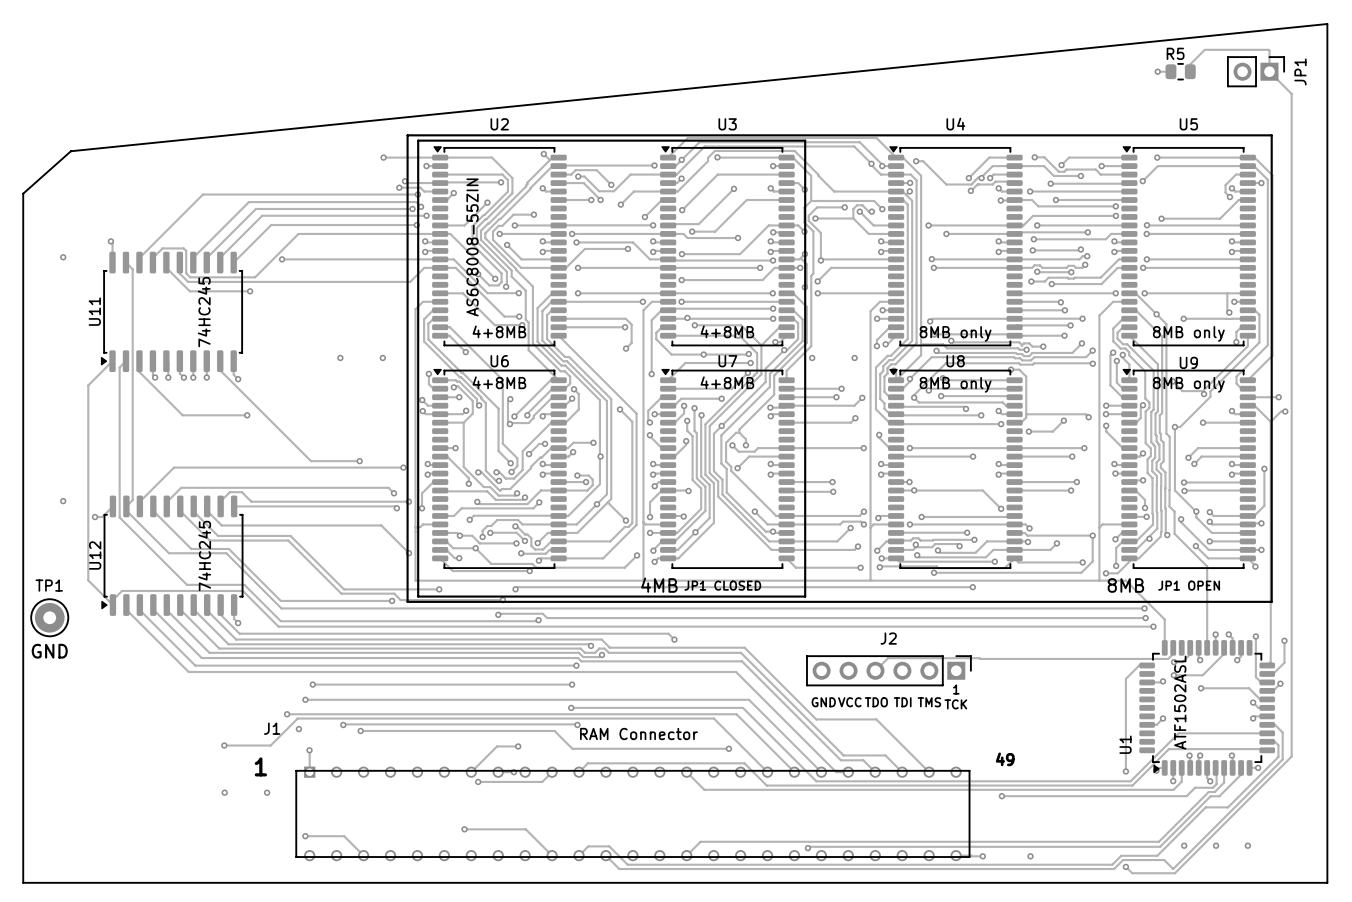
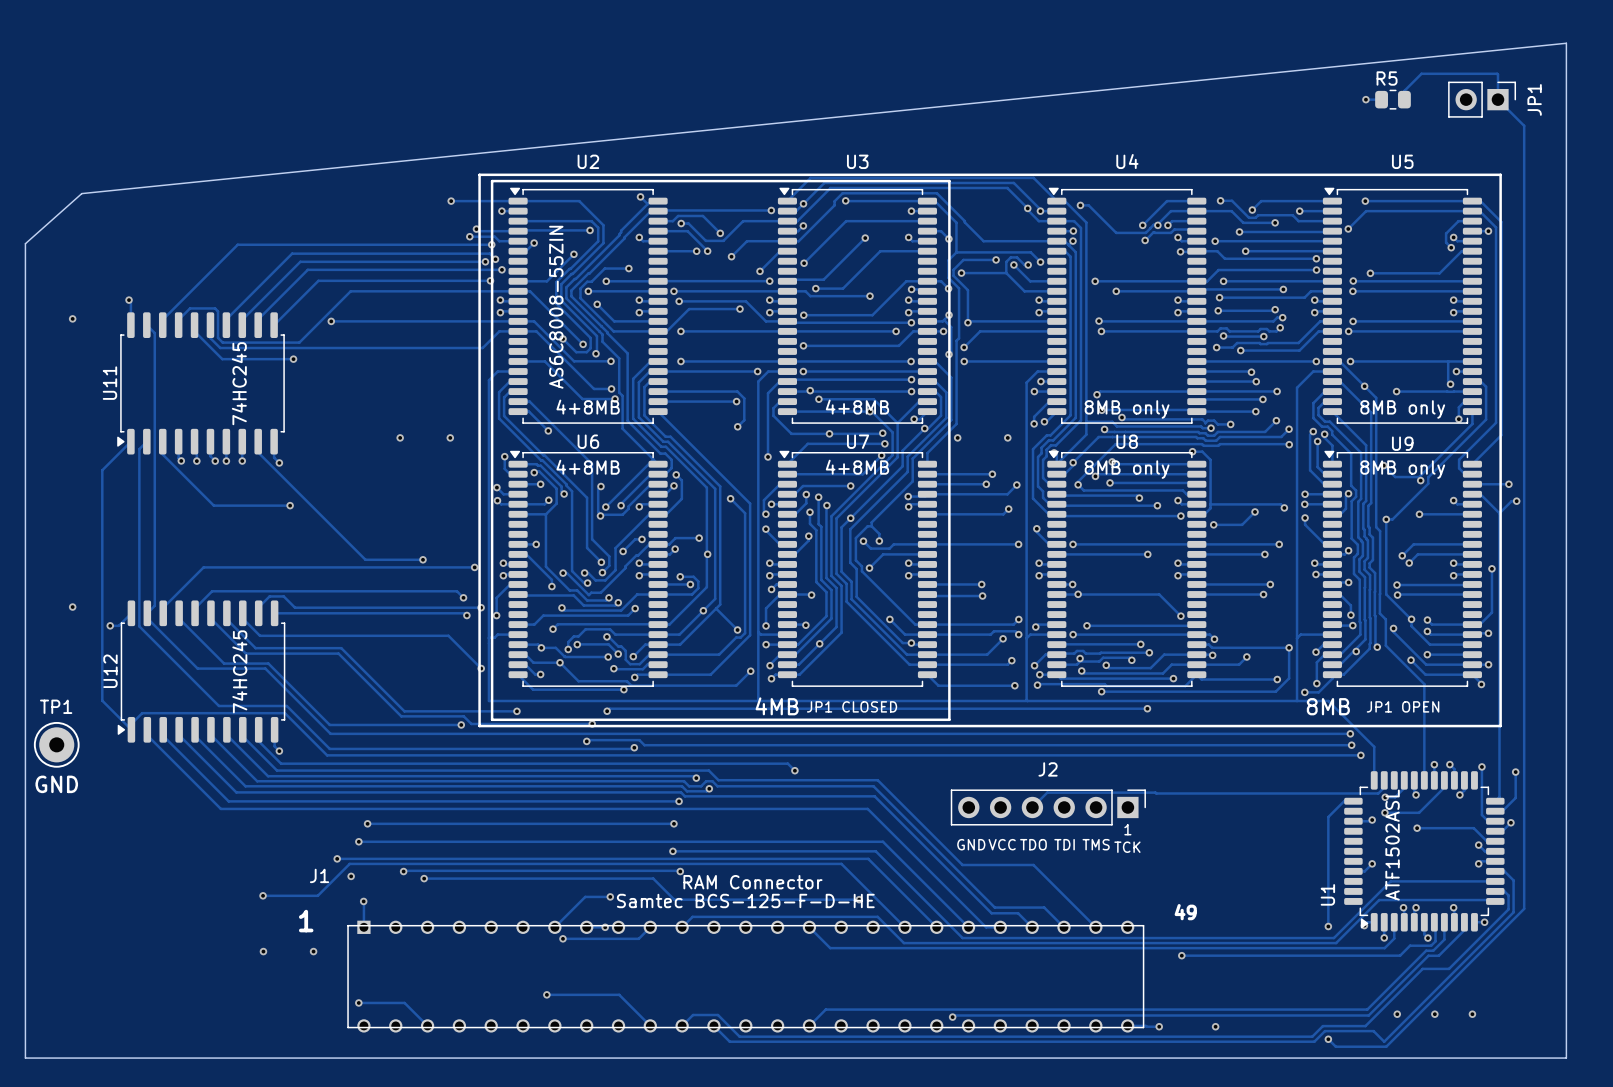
text: none -> Samtec BCS-125-F-D-HE (745, 900)

